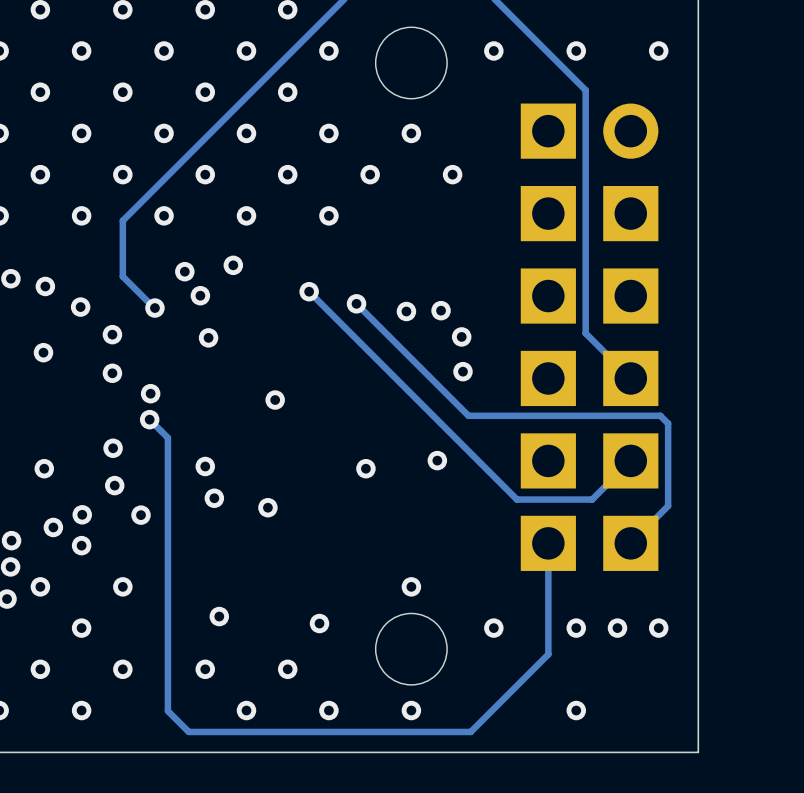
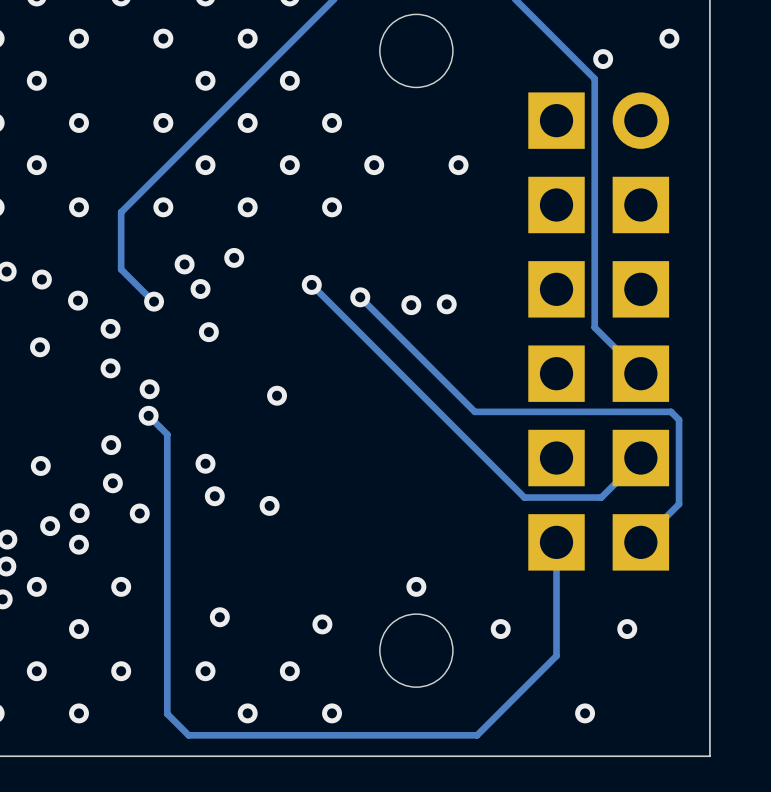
via: (328, 50) -> none
via: (493, 50) -> none
via position: (576, 50) -> (603, 59)
via: (122, 92) -> none
via: (411, 133) -> none
via: (122, 174) -> none
via: (461, 336) -> none
via: (462, 371) -> none
via: (437, 460) -> none
via: (365, 468) -> none
via: (576, 628) -> none
via: (658, 628) -> none
via: (411, 710) -> none

